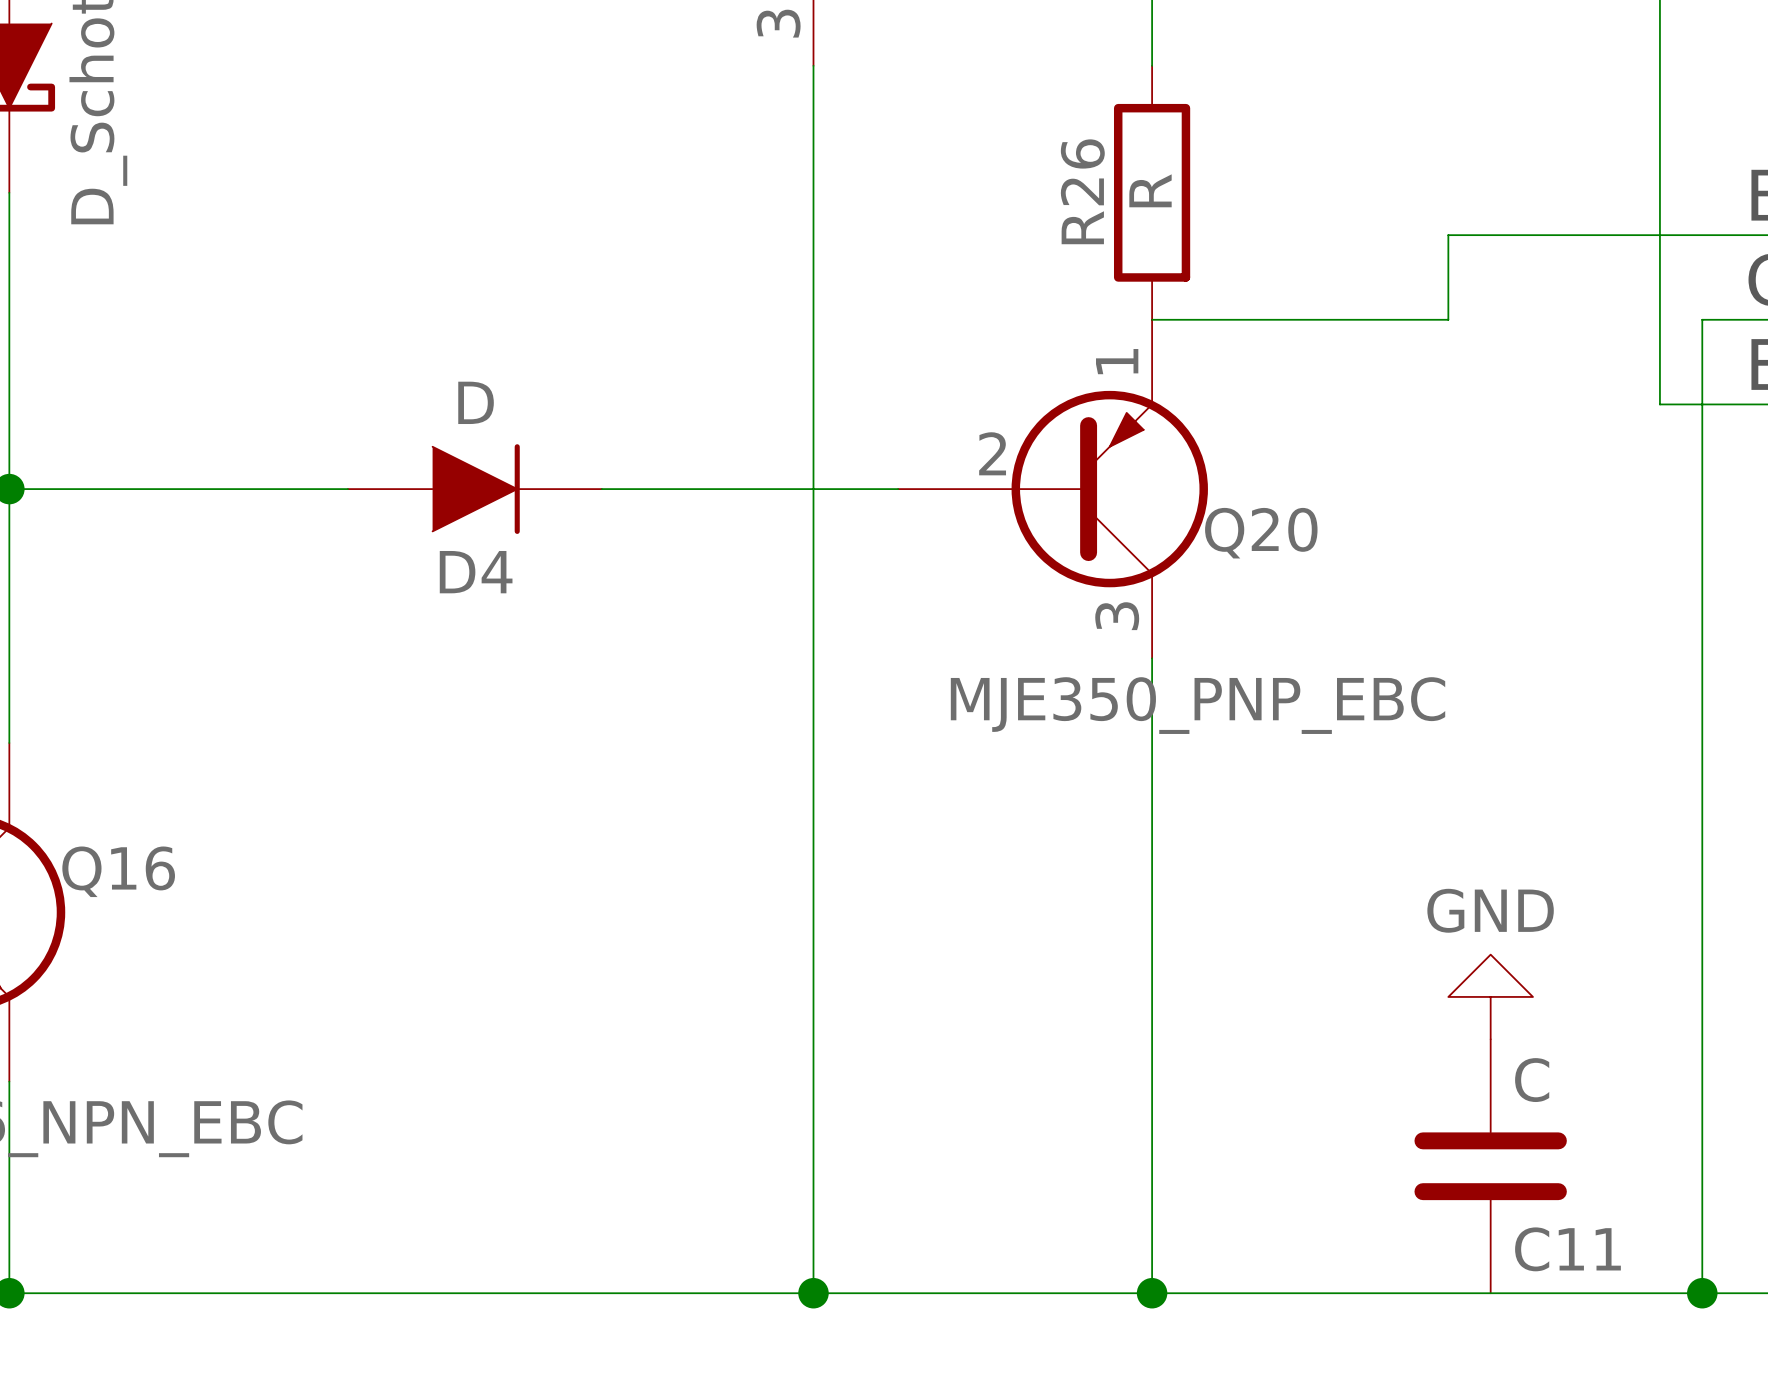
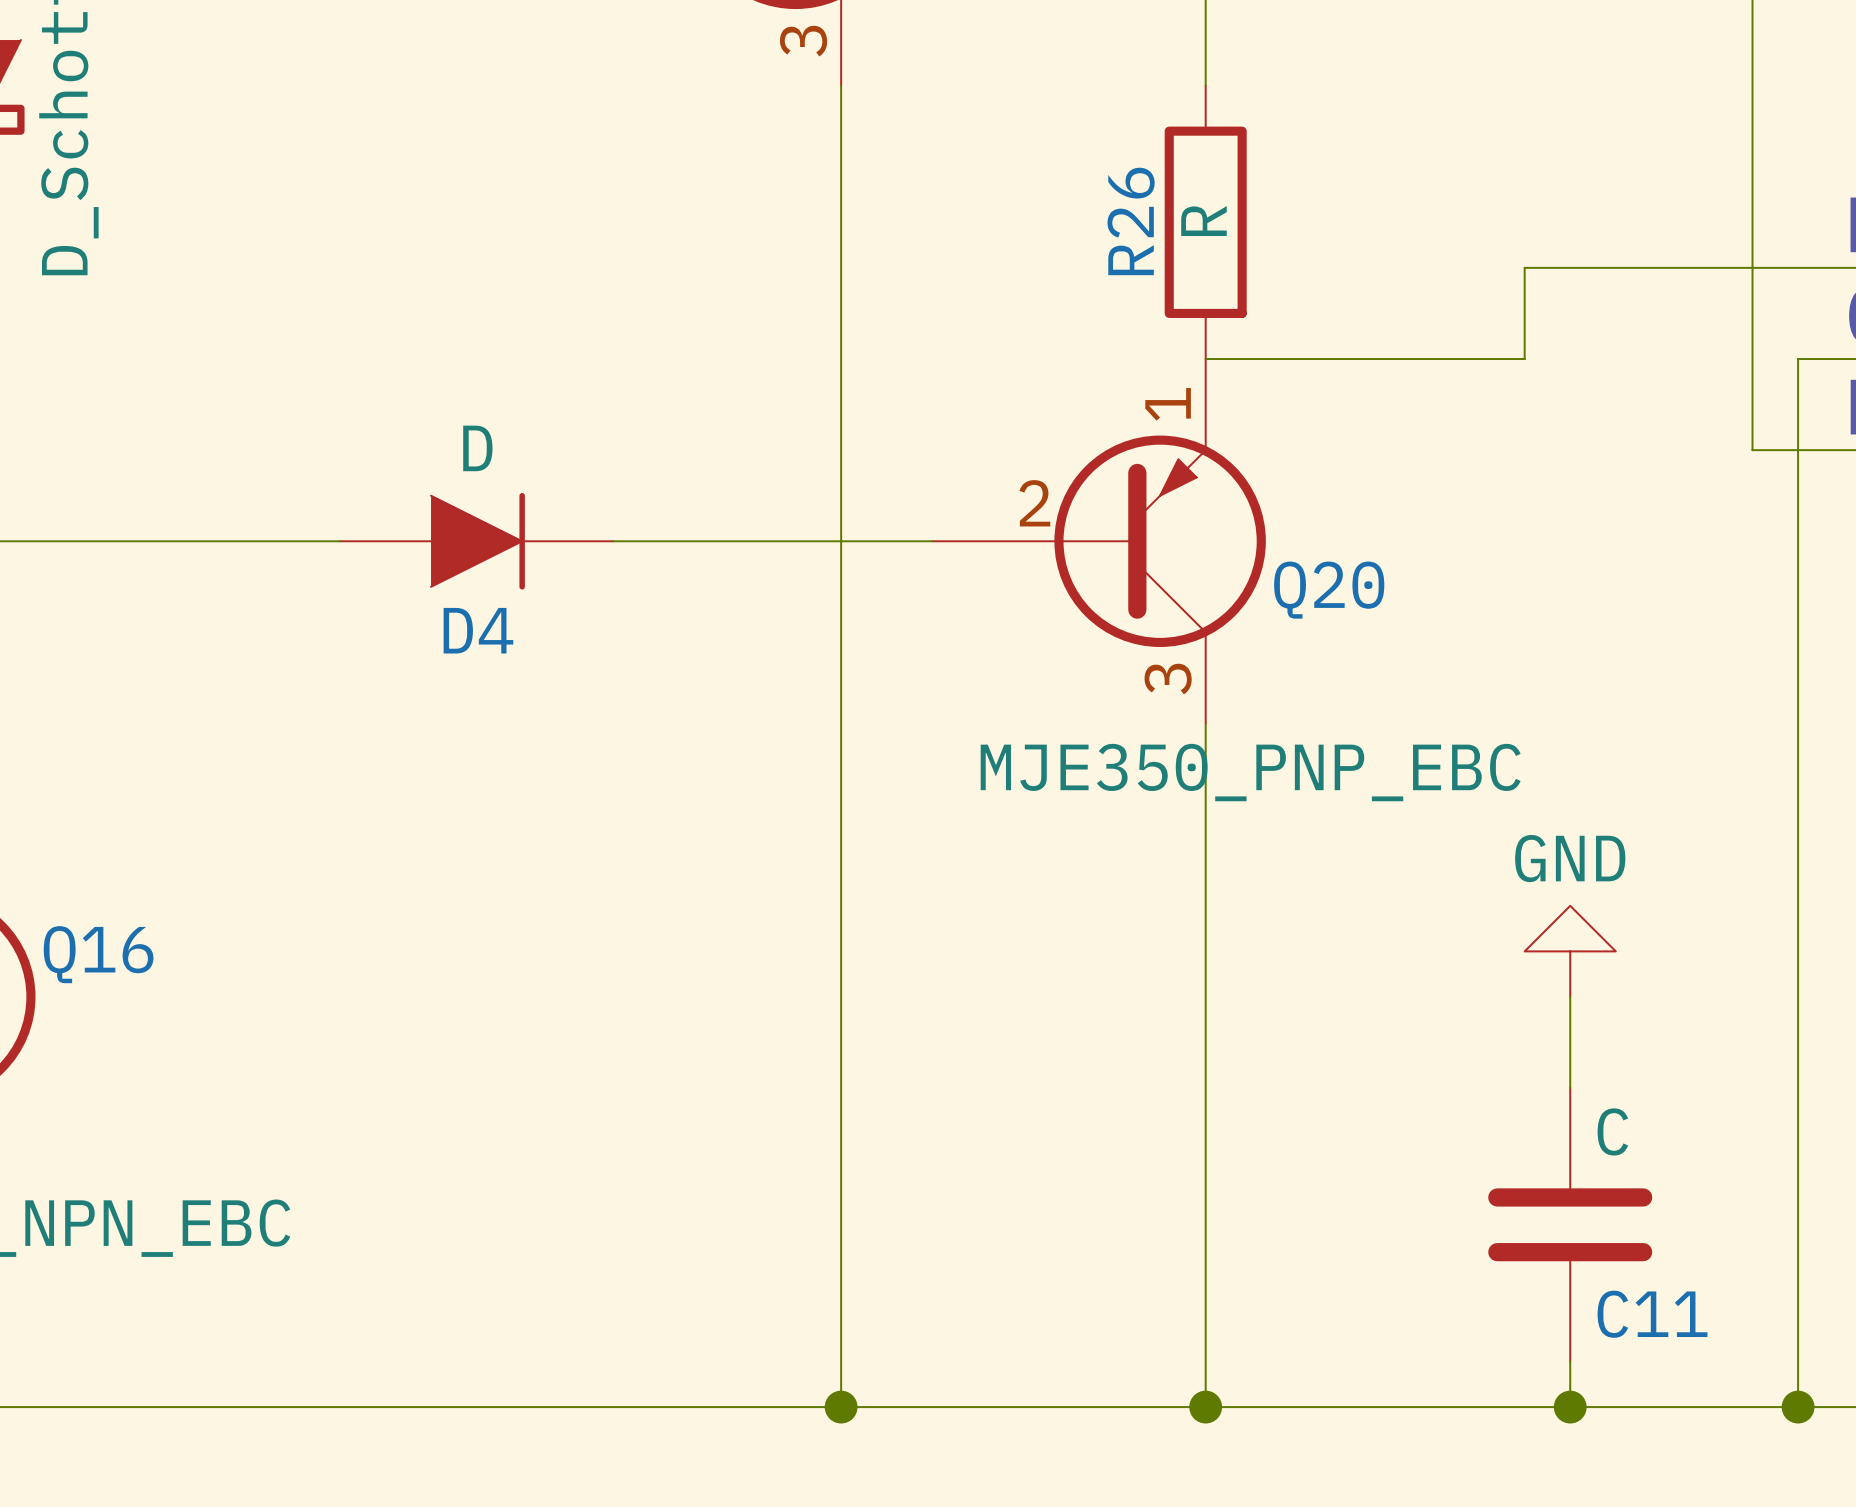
wire: none -> (1570, 996) (1570, 1088)
power symbol position: GND (1490, 996) -> GND (1570, 951)
C11 position: (1490, 1166) -> (1570, 1224)
junction: none -> (1570, 1407)

